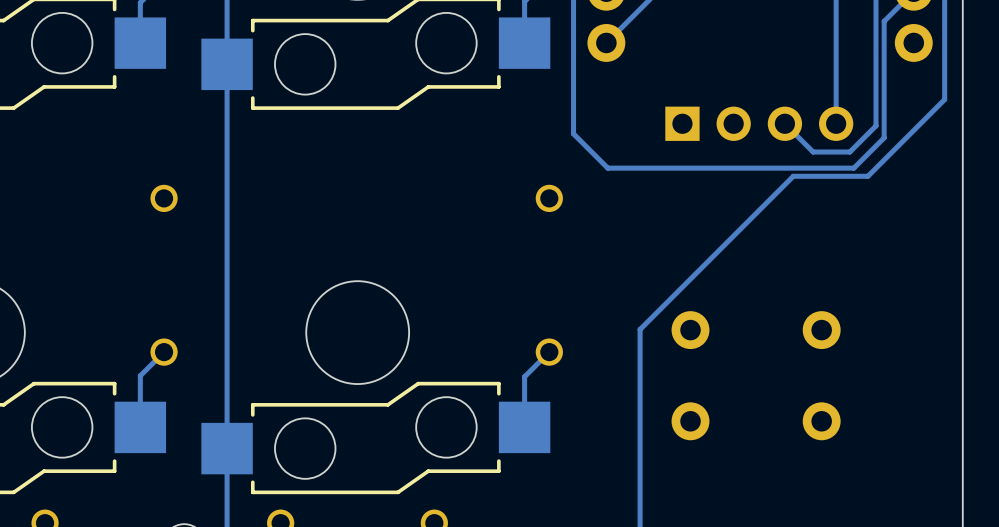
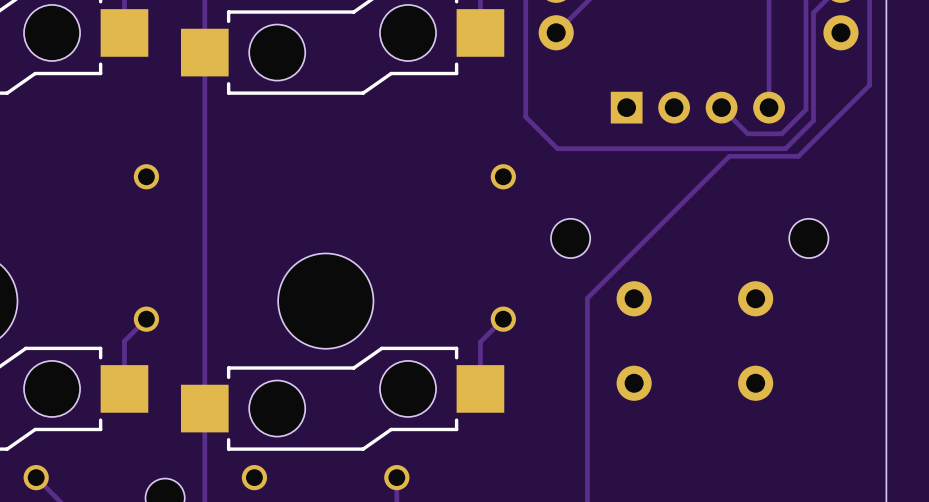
part: none -> (570, 238)
part: none -> (808, 238)

